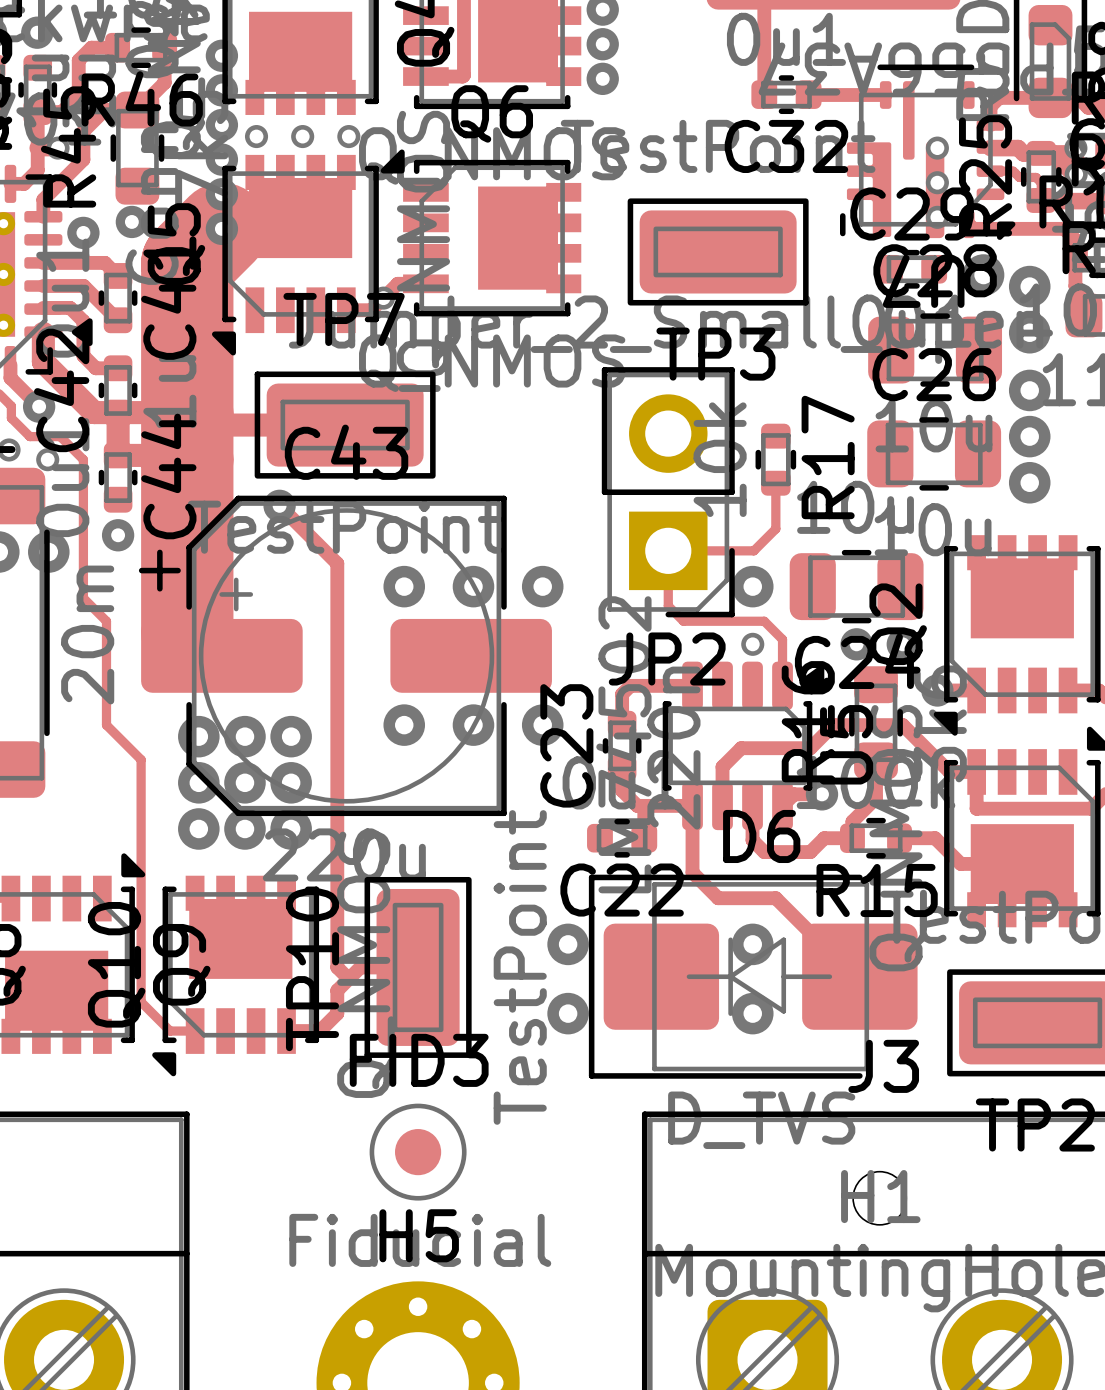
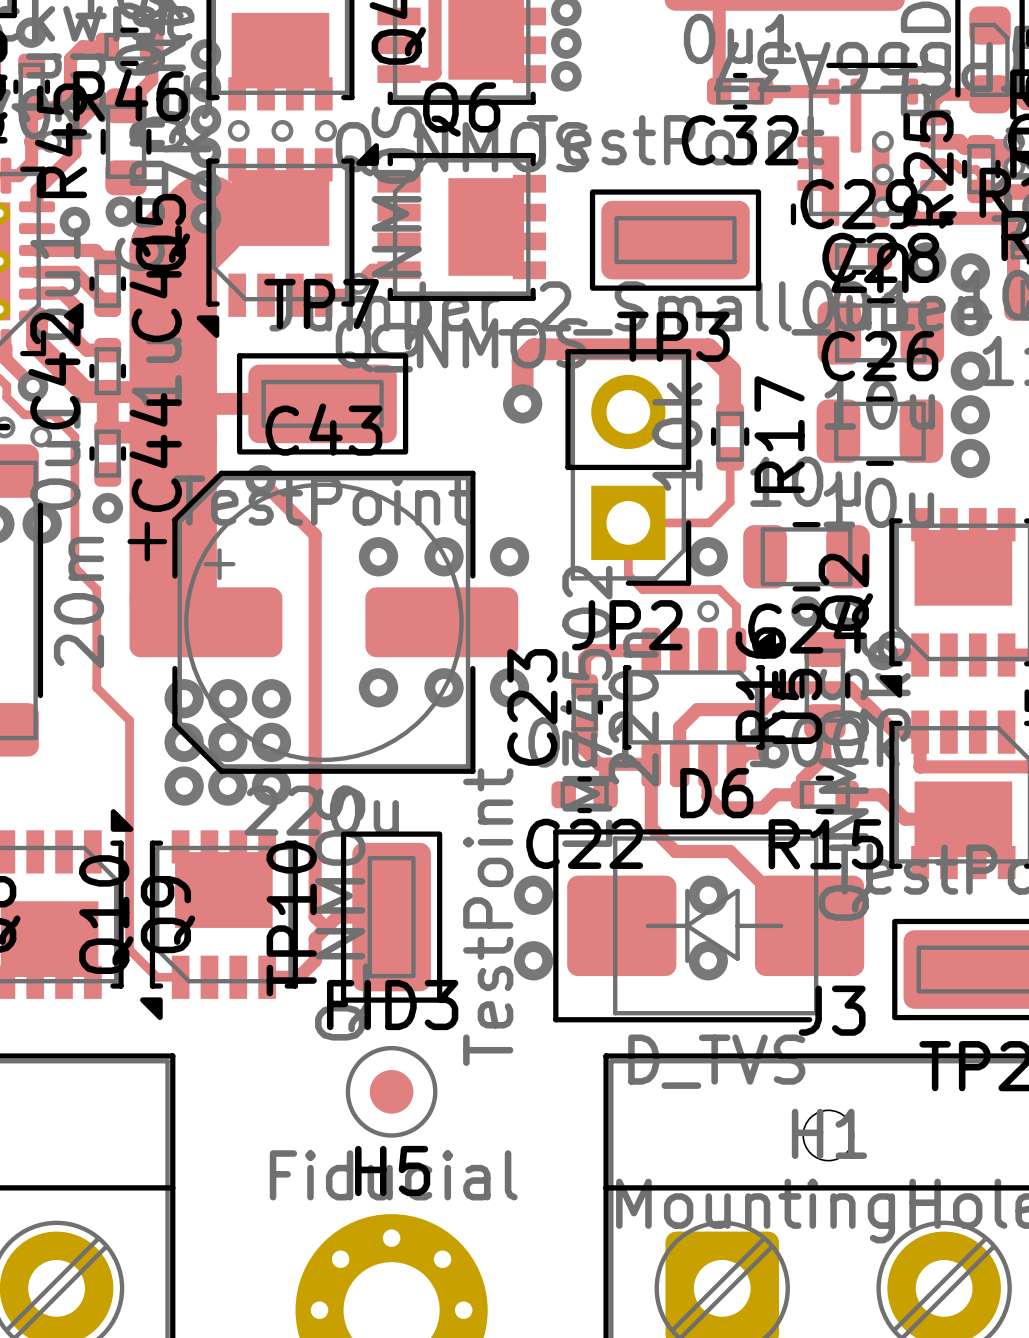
track: none -> (522, 403) (522, 360) (533, 349) (708, 349) (730, 371) (730, 414)
via: none -> (522, 403)

